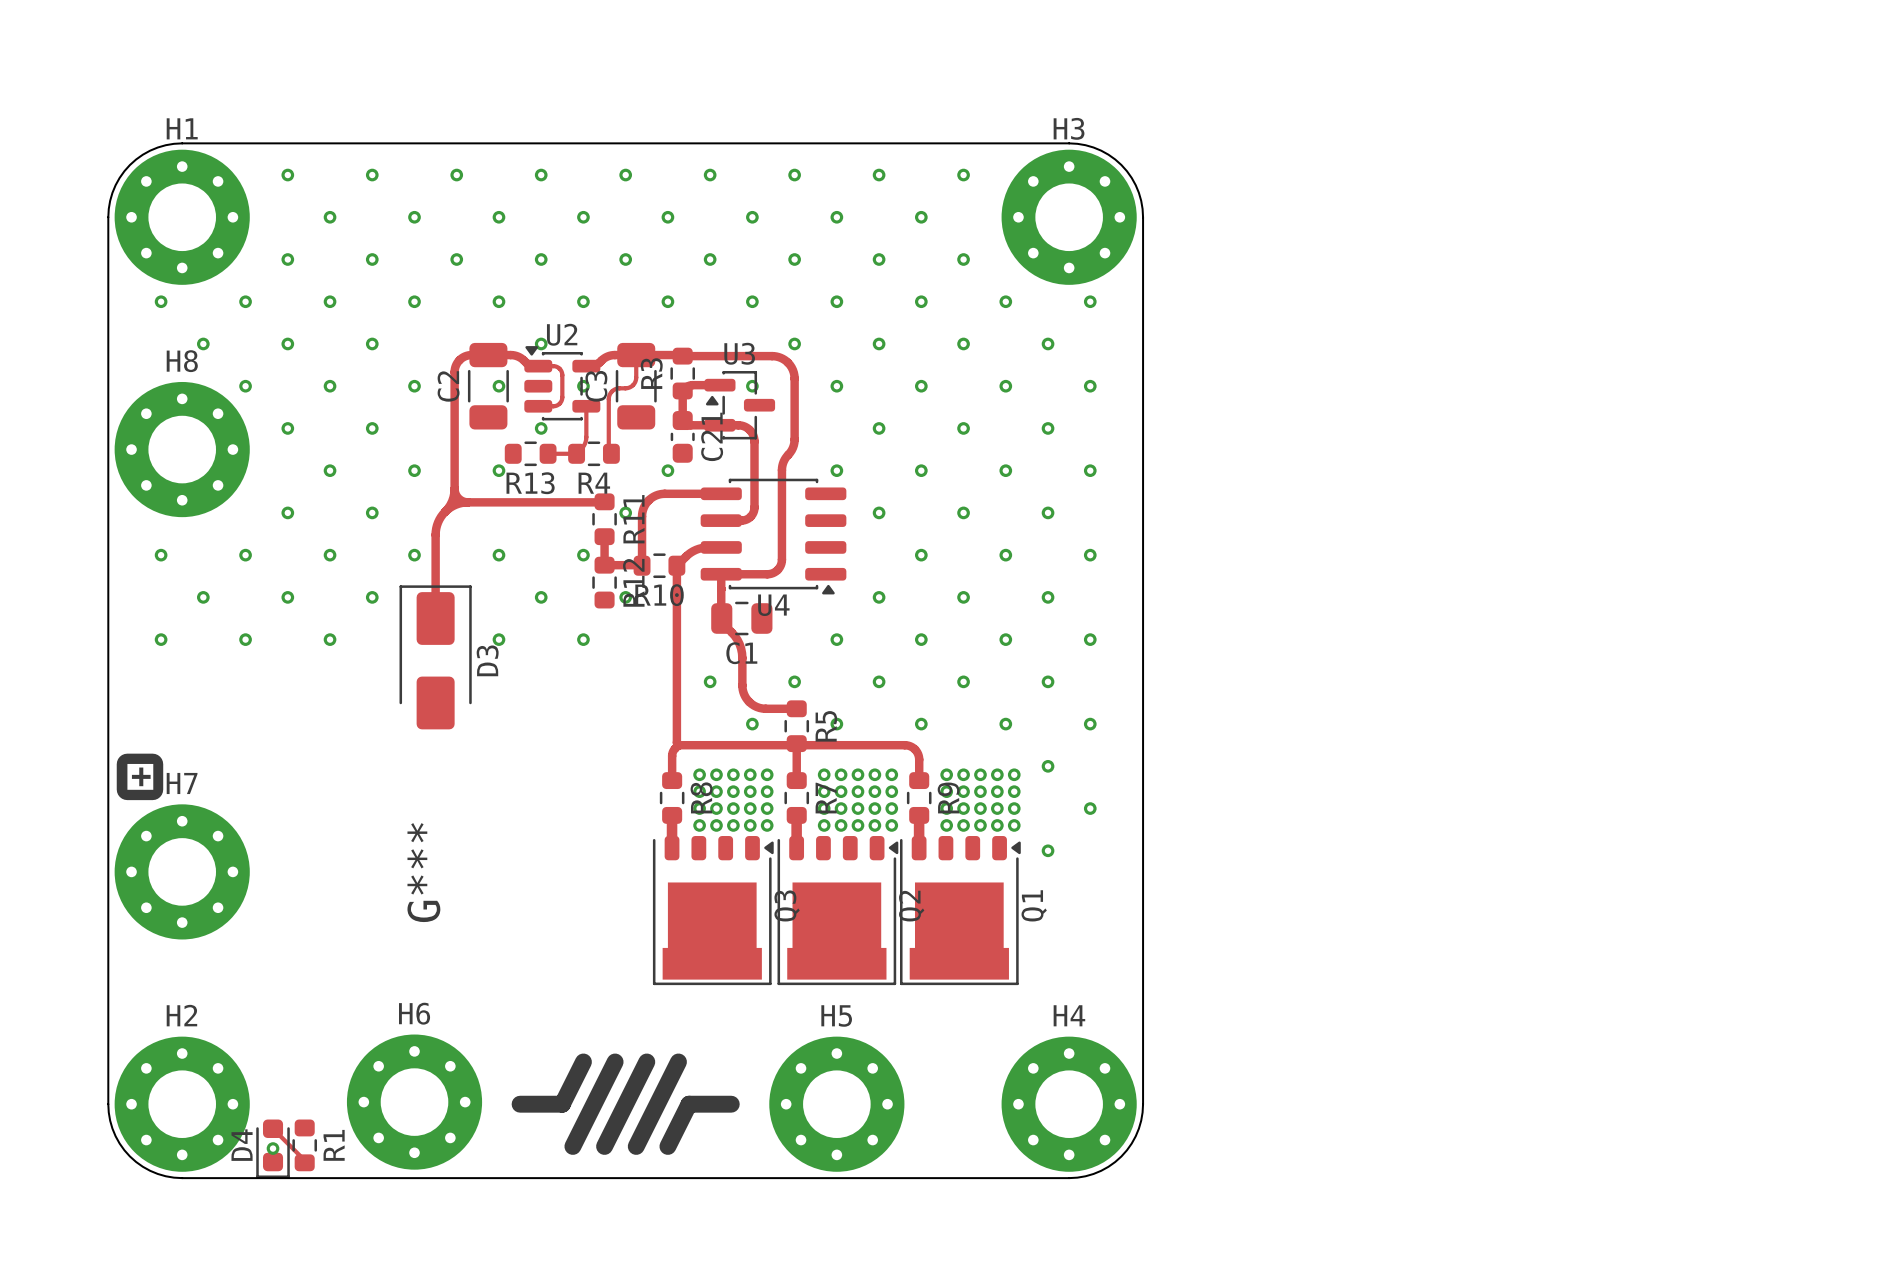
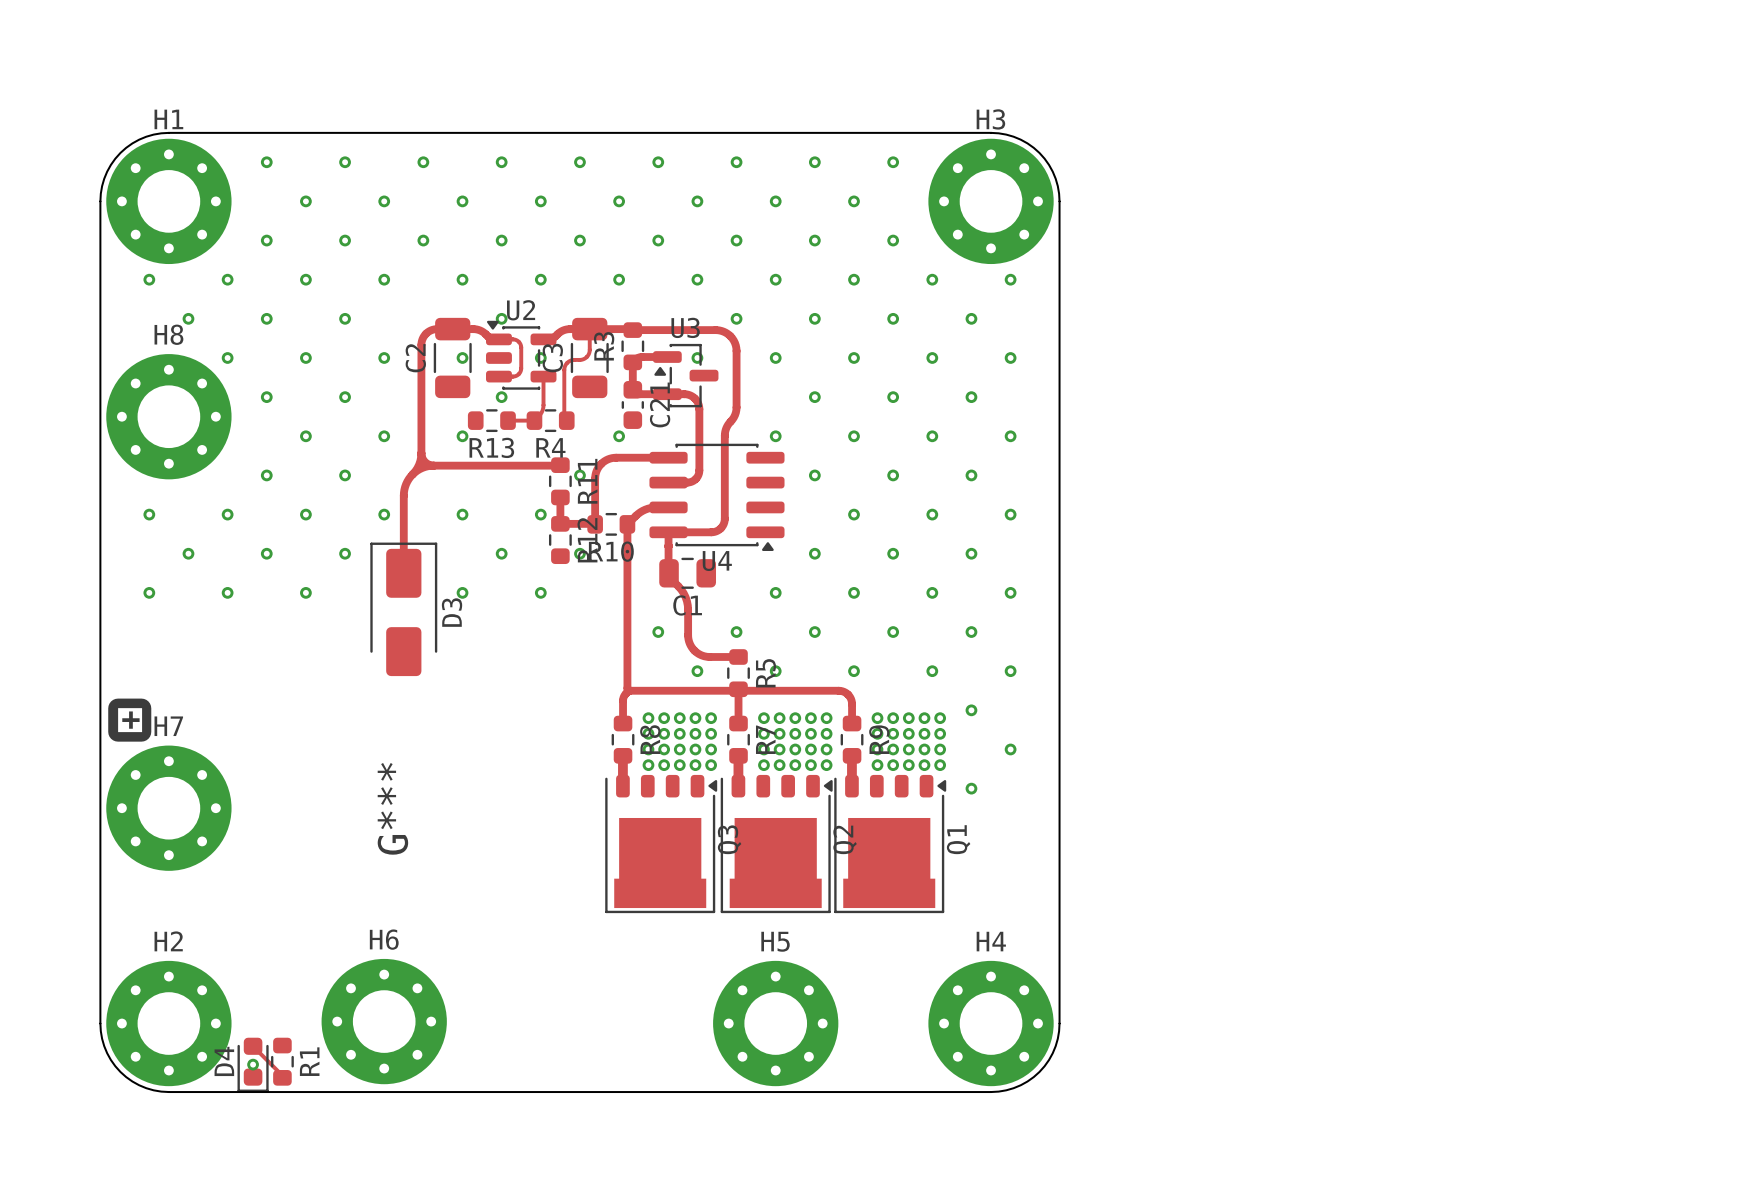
line: (583, 1061) (562, 1104) (520, 1104) -> none
line: (615, 1061) (572, 1146) -> none
line: (646, 1061) (604, 1146) -> none
line: (678, 1061) (636, 1146) -> none
line: (731, 1104) (689, 1104) (667, 1146) -> none

